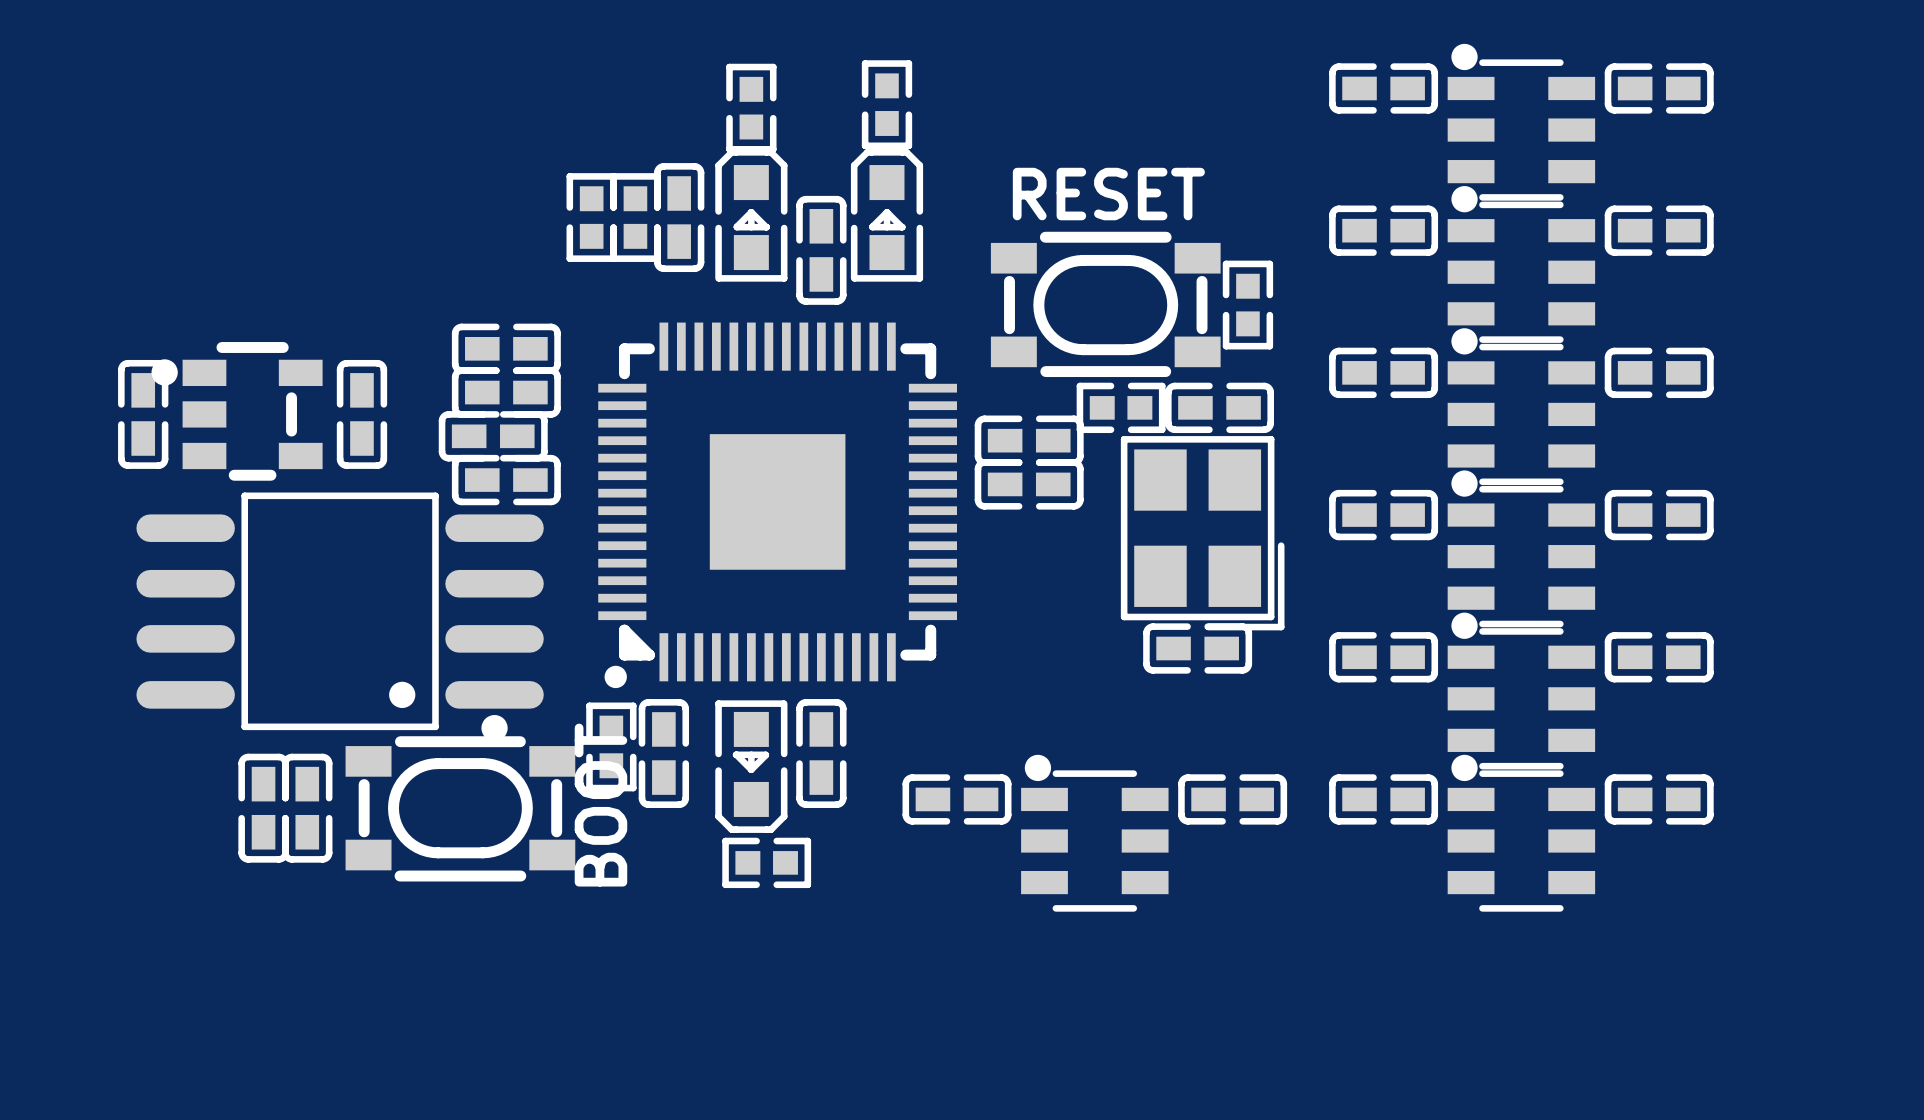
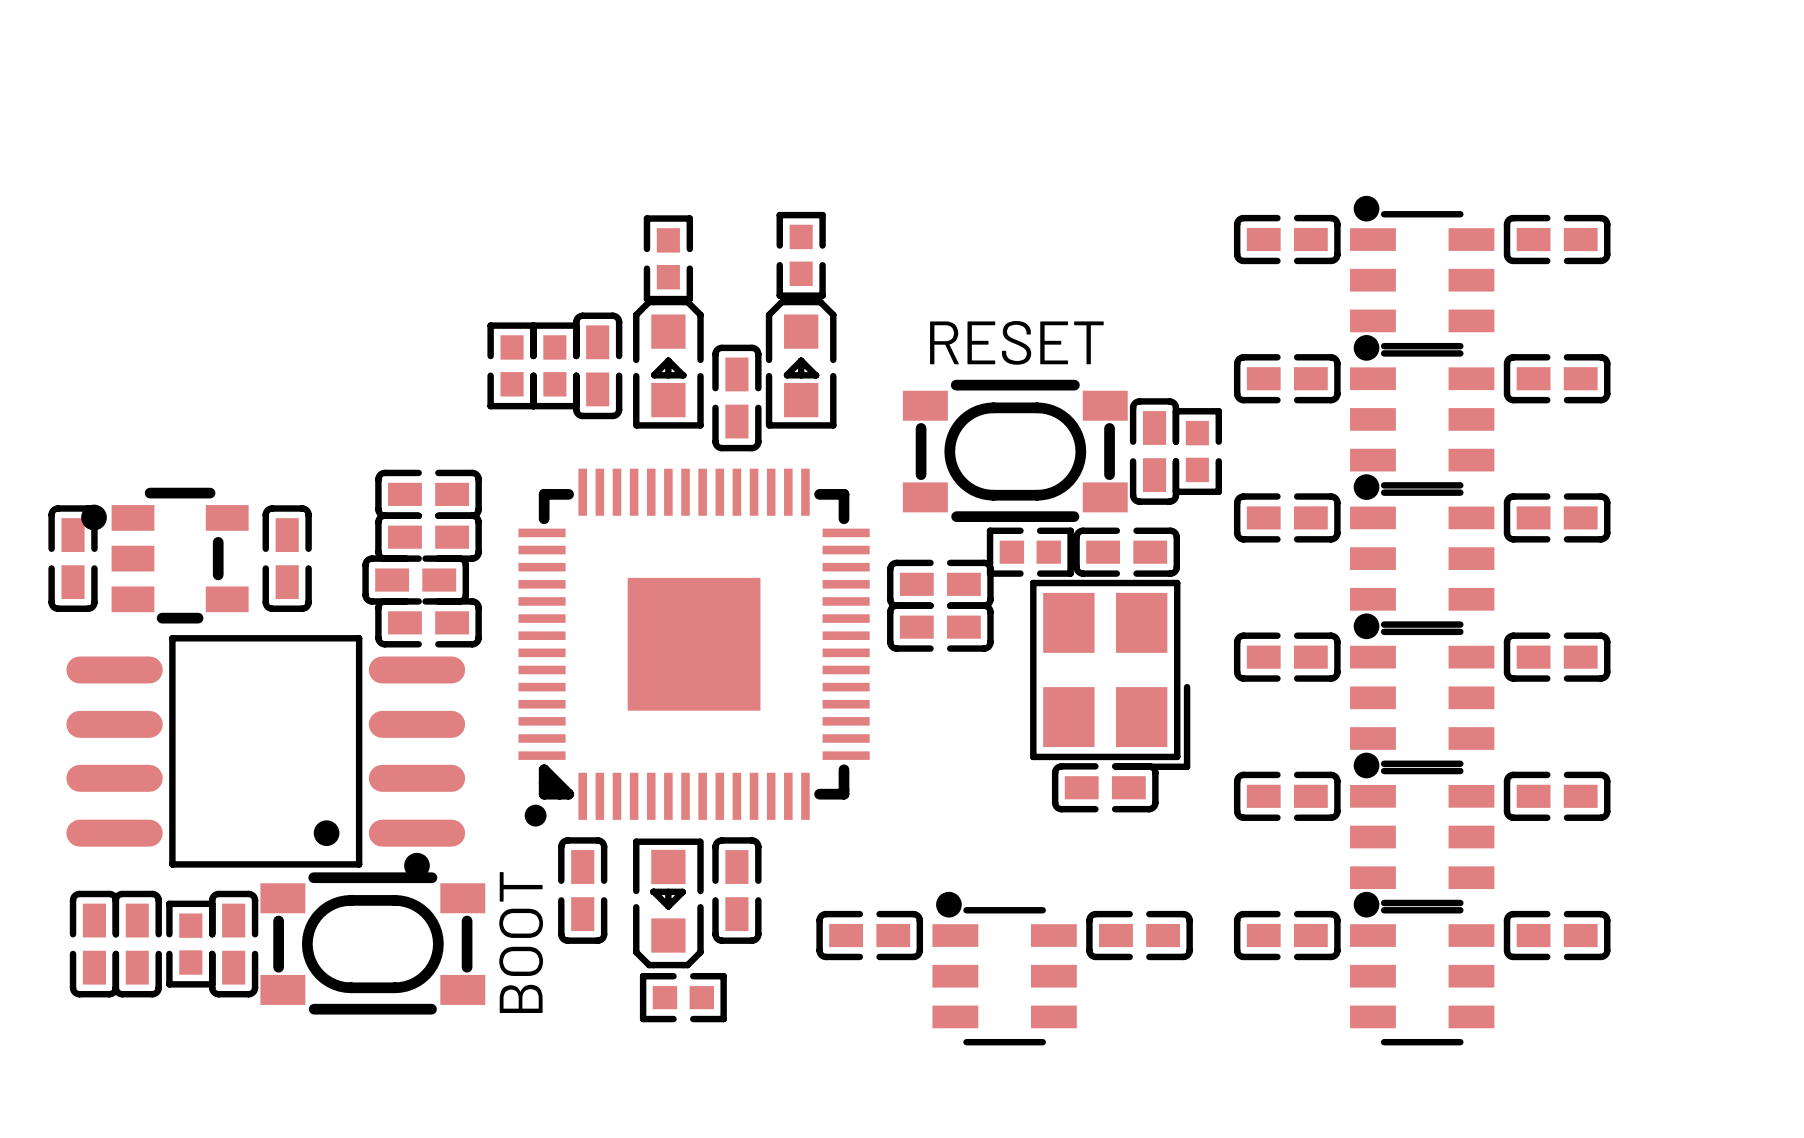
part footprint: [1222, 260, 1274, 350] -> [1129, 398, 1180, 505]
part footprint: [345, 736, 576, 882] -> [260, 872, 486, 1015]
part position: (611, 746) -> (1197, 451)
part footprint: [238, 753, 289, 863] -> [166, 900, 216, 988]
part: none -> (94, 944)
part: none -> (137, 944)

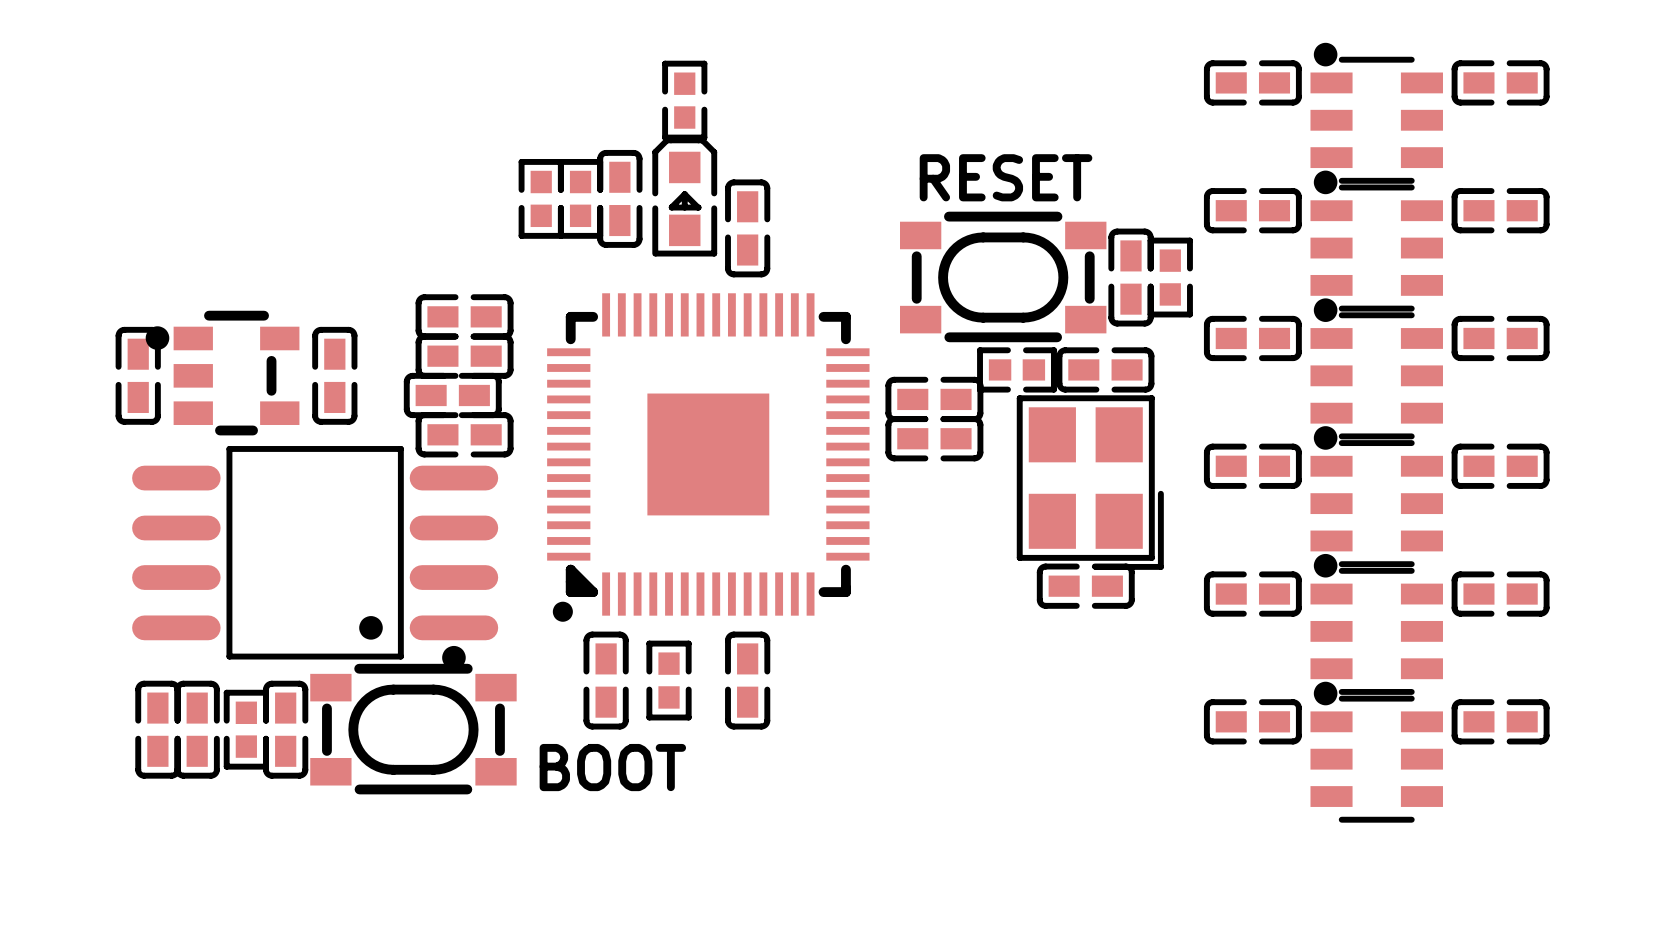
part: (801, 255) -> none
part: (801, 363) -> none
part footprint: [633, 838, 704, 969] -> [646, 640, 692, 721]
part: (869, 935) -> none
part: (1139, 935) -> none
text rotation: 0° (521, 942) -> 90° clockwise (612, 767)
part: (1004, 968) -> none
part: (683, 997) -> none

